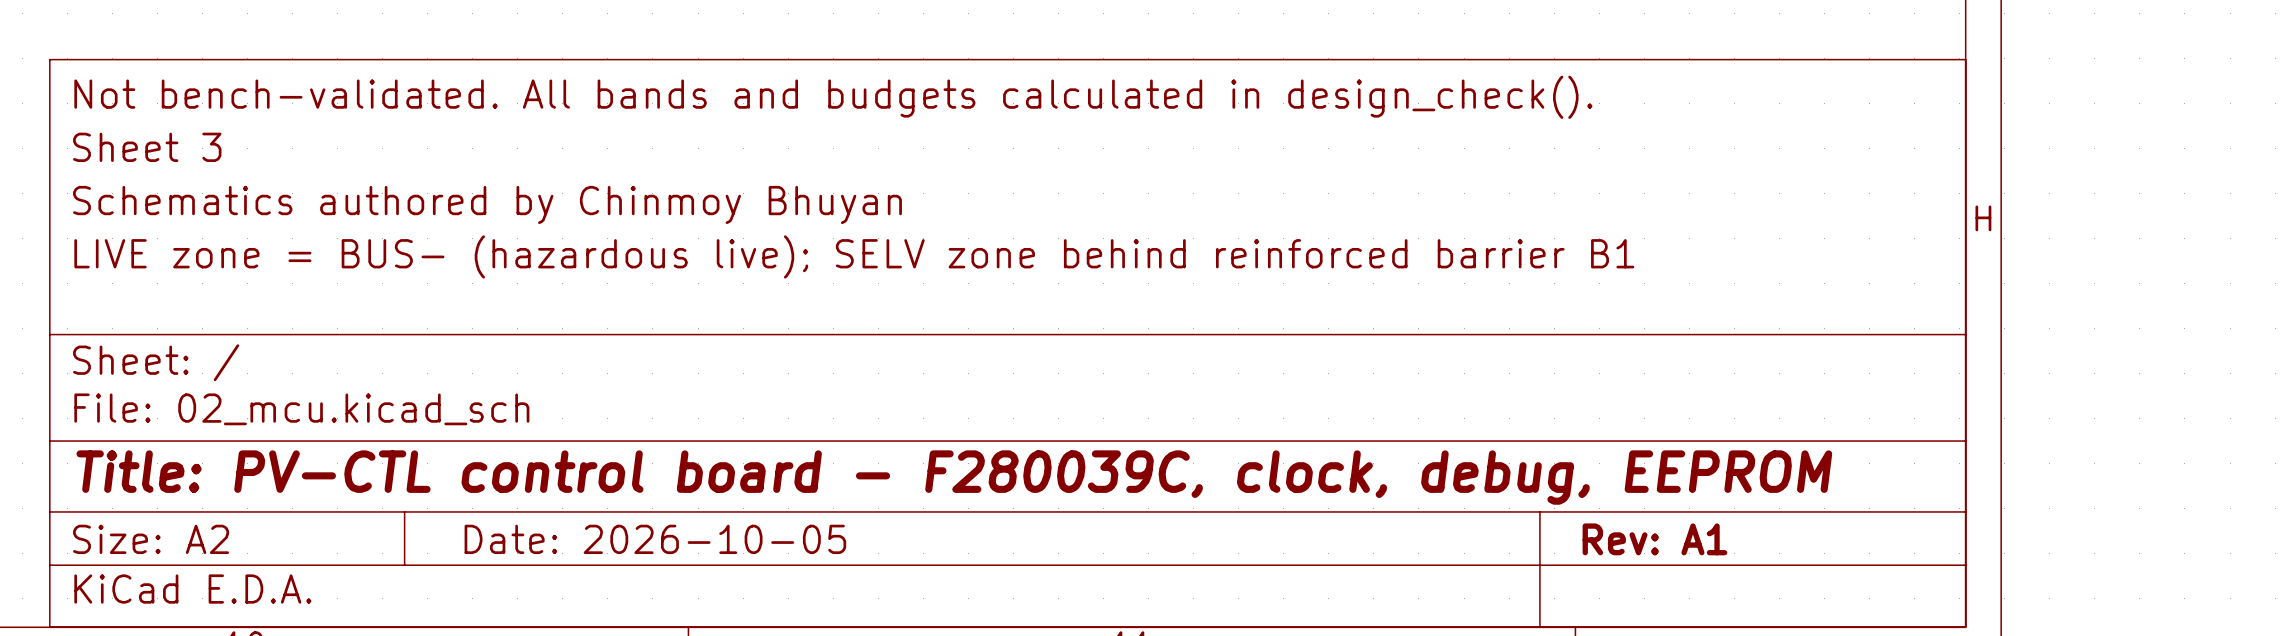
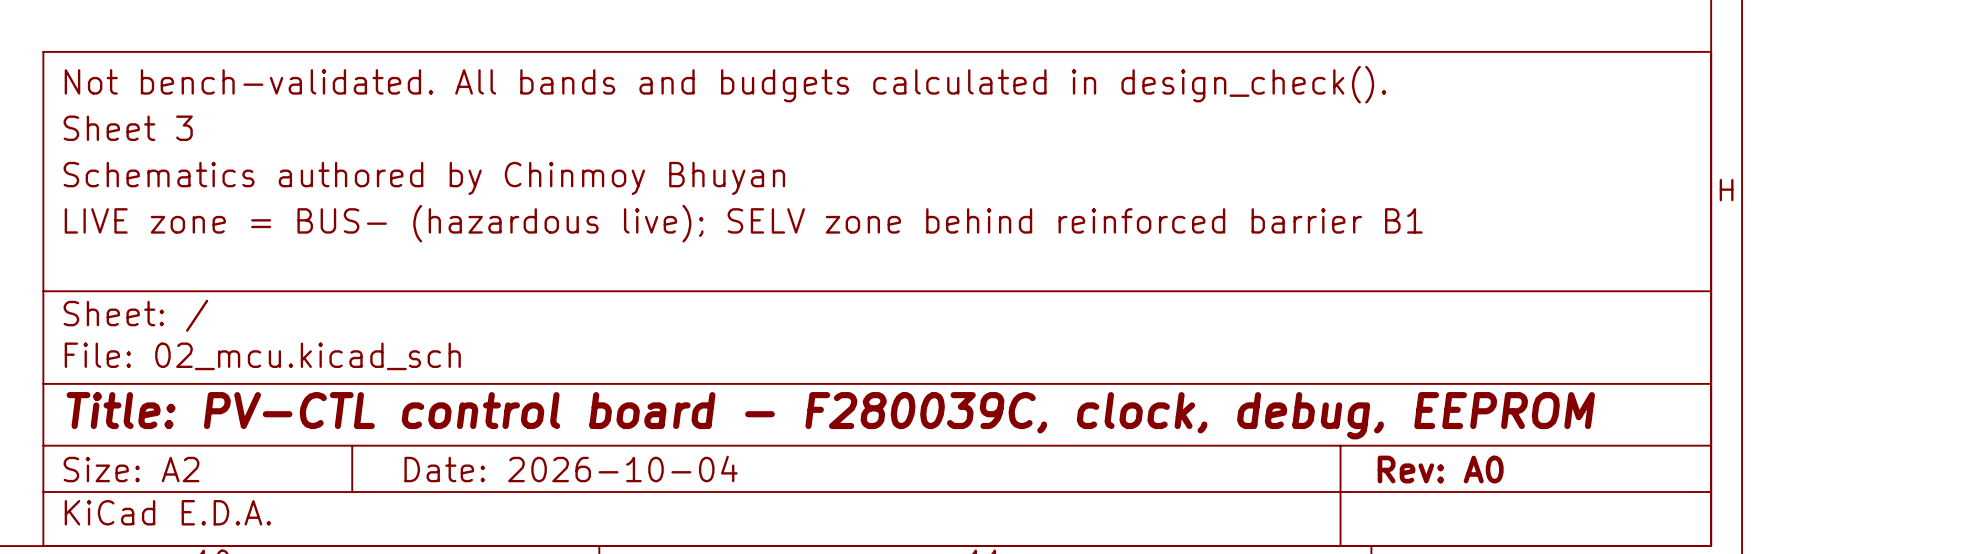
title block: Date: 2026-10-05 (655, 539) -> Date: 2026-10-04 (571, 468)
title block: Rev: A1 (1654, 539) -> Rev: A0 (1440, 469)

